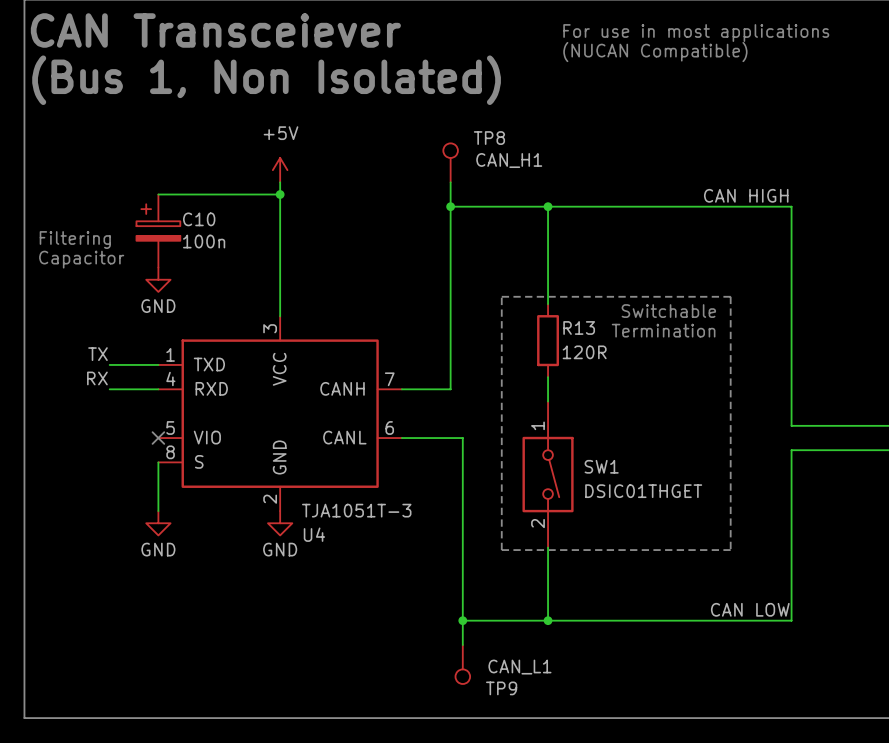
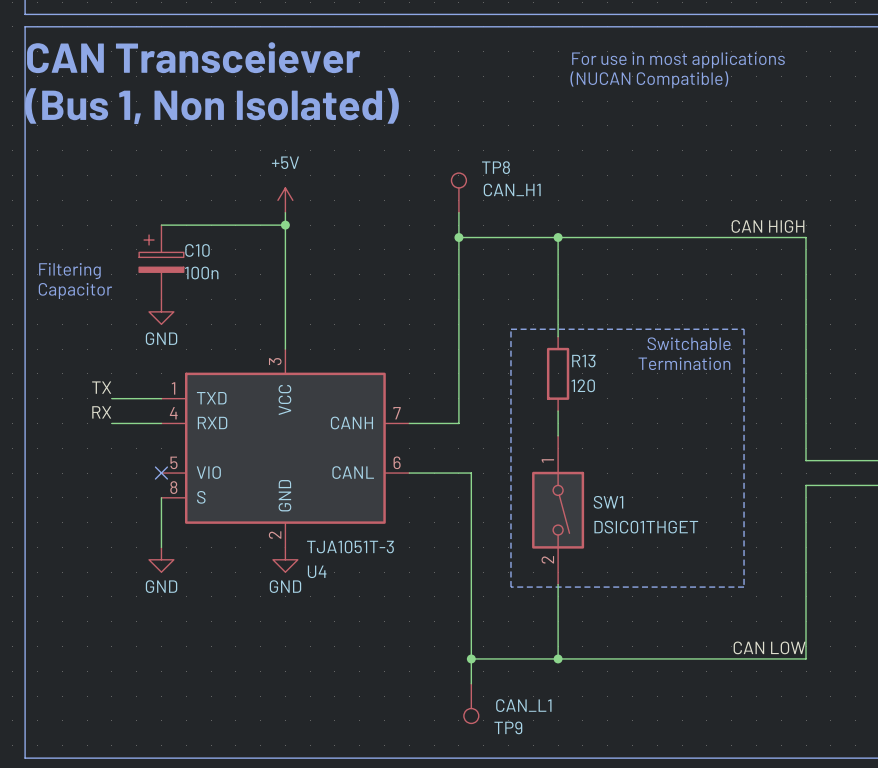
R13 value: 120R (584, 352) -> 120 (583, 385)

